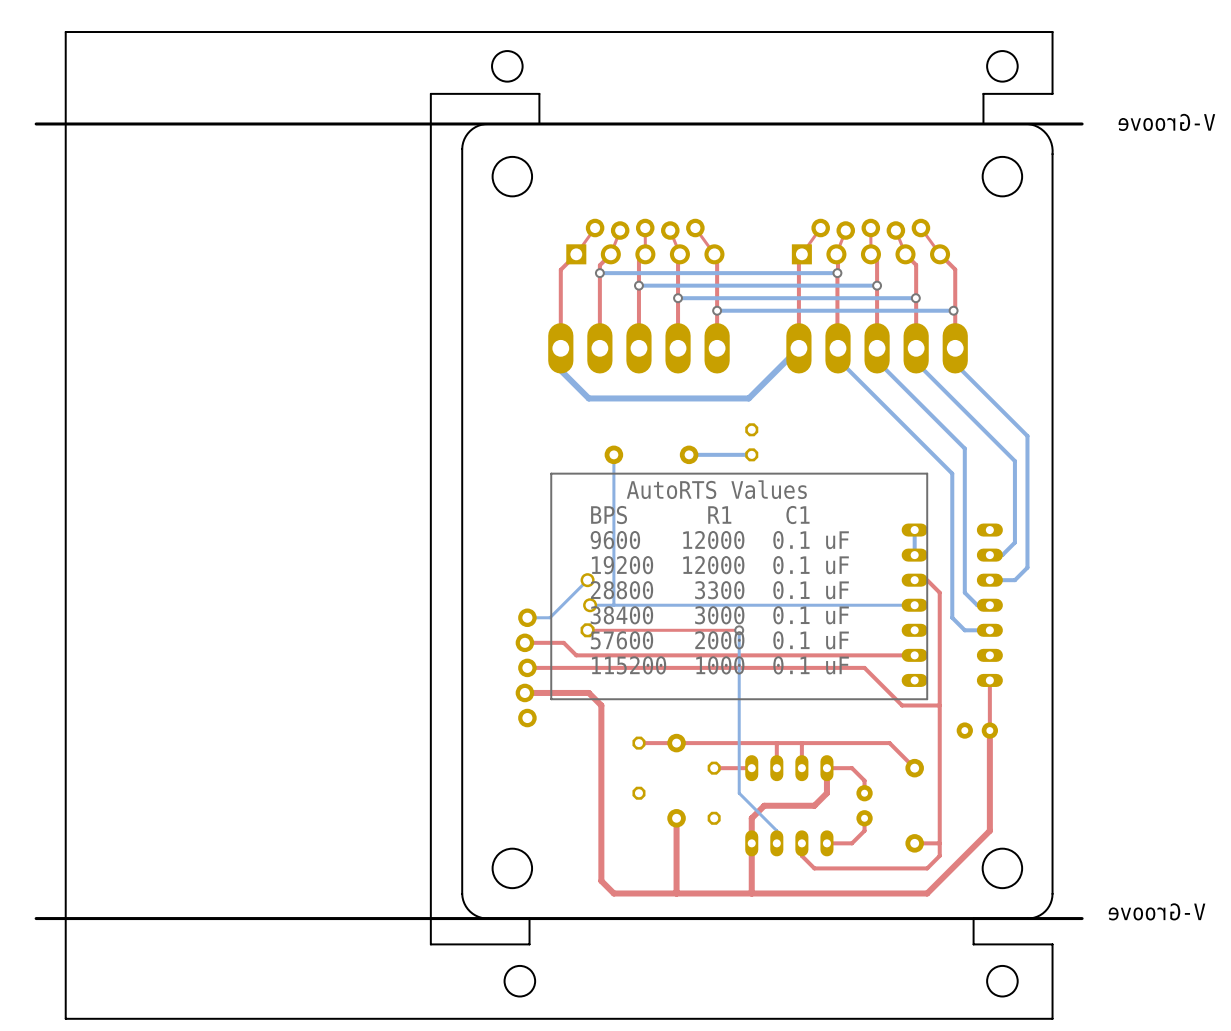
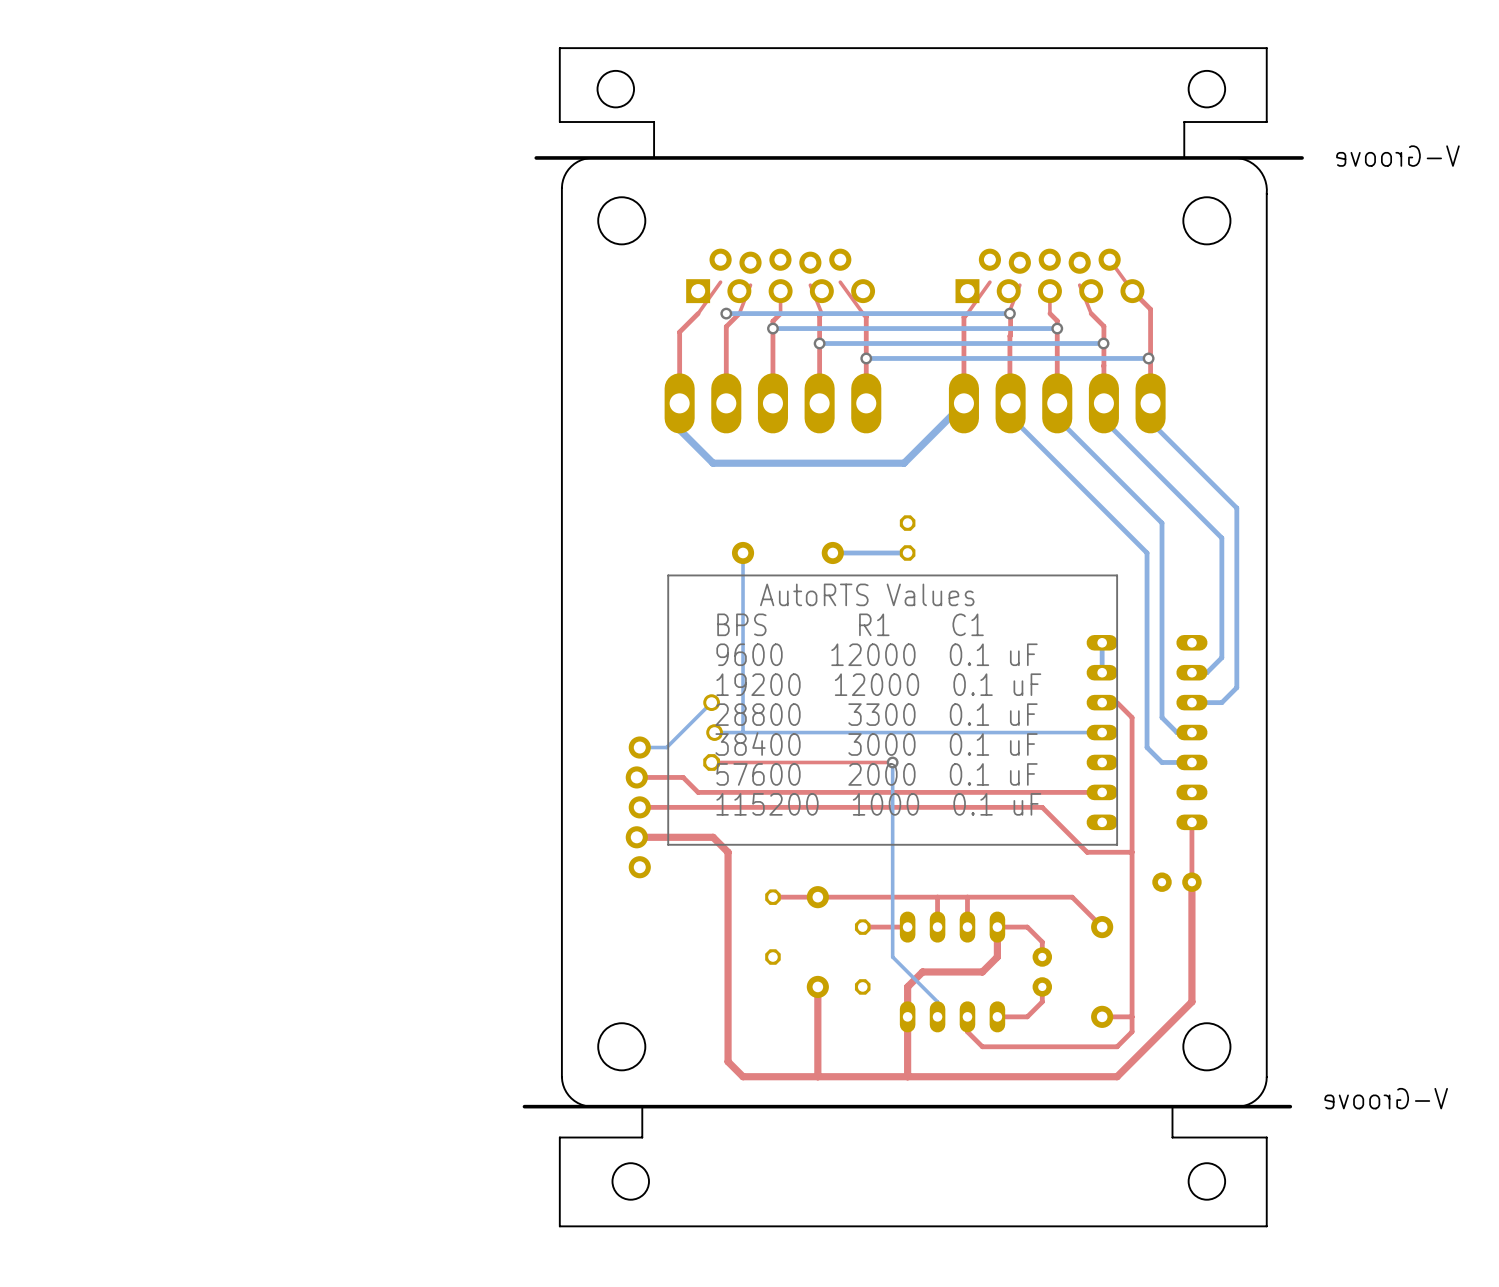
part: none -> (780, 261)
part: none -> (1049, 261)
part footprint: [585, 218, 705, 240] -> [686, 279, 876, 304]
part footprint: [811, 218, 931, 240] -> [955, 279, 1145, 304]
top track: (920, 228) (940, 254) (955, 269) -> (1109, 259) (1132, 291) (1150, 309) (1150, 331)
part: (645, 254) -> none
part: (870, 254) -> none
via position: (599, 273) -> (726, 313)
bottom track: (837, 273) (599, 273) -> (1009, 313) (726, 313)
via position: (837, 273) -> (1009, 313)
via position: (638, 285) -> (772, 328)
bottom track: (877, 285) (638, 285) -> (1057, 328) (772, 328)
via position: (877, 285) -> (1057, 328)
via position: (678, 298) -> (819, 343)
bottom track: (915, 298) (678, 298) -> (1103, 343) (819, 343)
via position: (915, 298) -> (1103, 343)
via position: (717, 310) -> (866, 358)
bottom track: (953, 310) (717, 310) -> (1148, 358) (866, 358)
via position: (953, 310) -> (1148, 358)
part position: (638, 348) -> (772, 403)
bottom track: (798, 348) (748, 398) (588, 398) (560, 370) (560, 351) -> (963, 403) (904, 463) (713, 463) (679, 429)
bottom track: (838, 348) (839, 360) (952, 473) -> (1010, 403) (1012, 405) (1012, 418) (1147, 553) (1147, 575)
bottom track: (877, 348) (877, 360) (964, 448) -> (1057, 403) (1057, 418) (1162, 523) (1162, 545)
part position: (877, 348) -> (1057, 403)
bottom track: (916, 348) (914, 360) (1014, 461) -> (1103, 403) (1102, 405) (1102, 418) (1221, 538) (1221, 560)
bottom track: (955, 348) (955, 363) (1027, 436) -> (1150, 403) (1150, 421) (1236, 508) (1236, 530)
part: (559, 525) -> none
part: none -> (913, 637)

